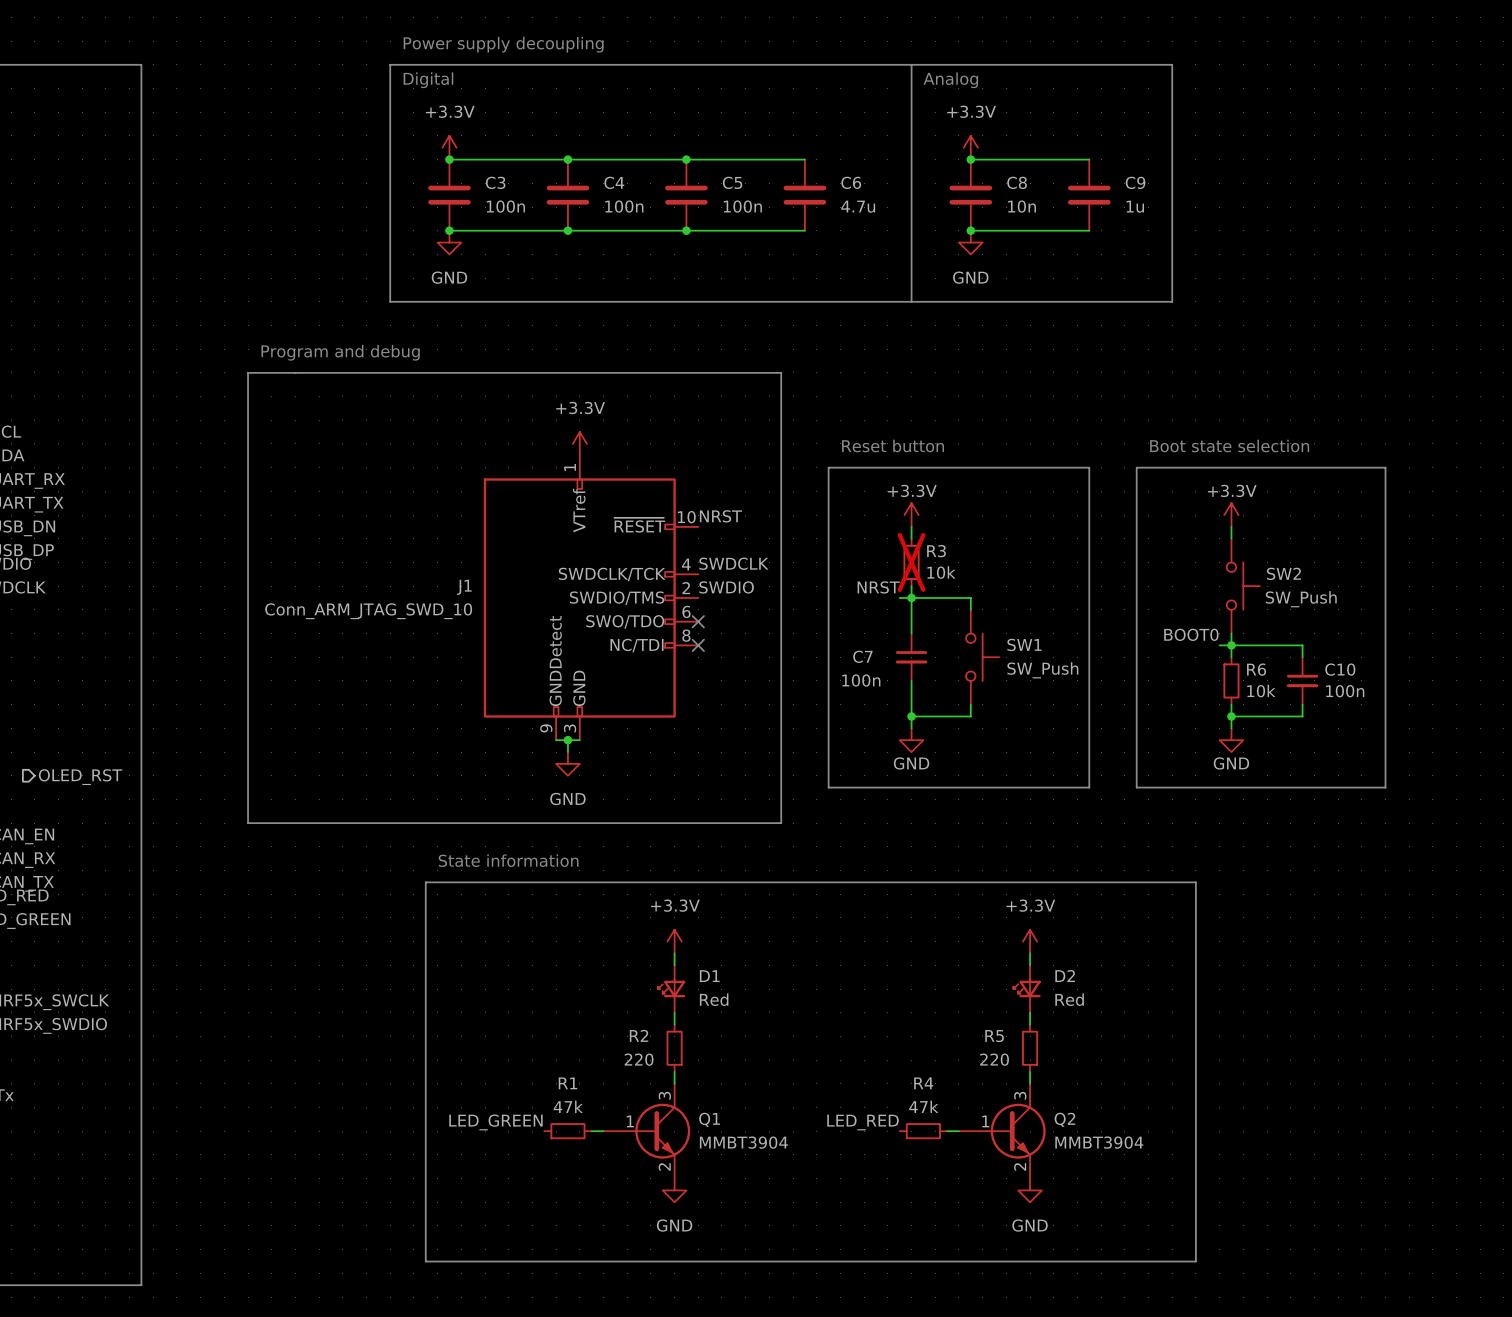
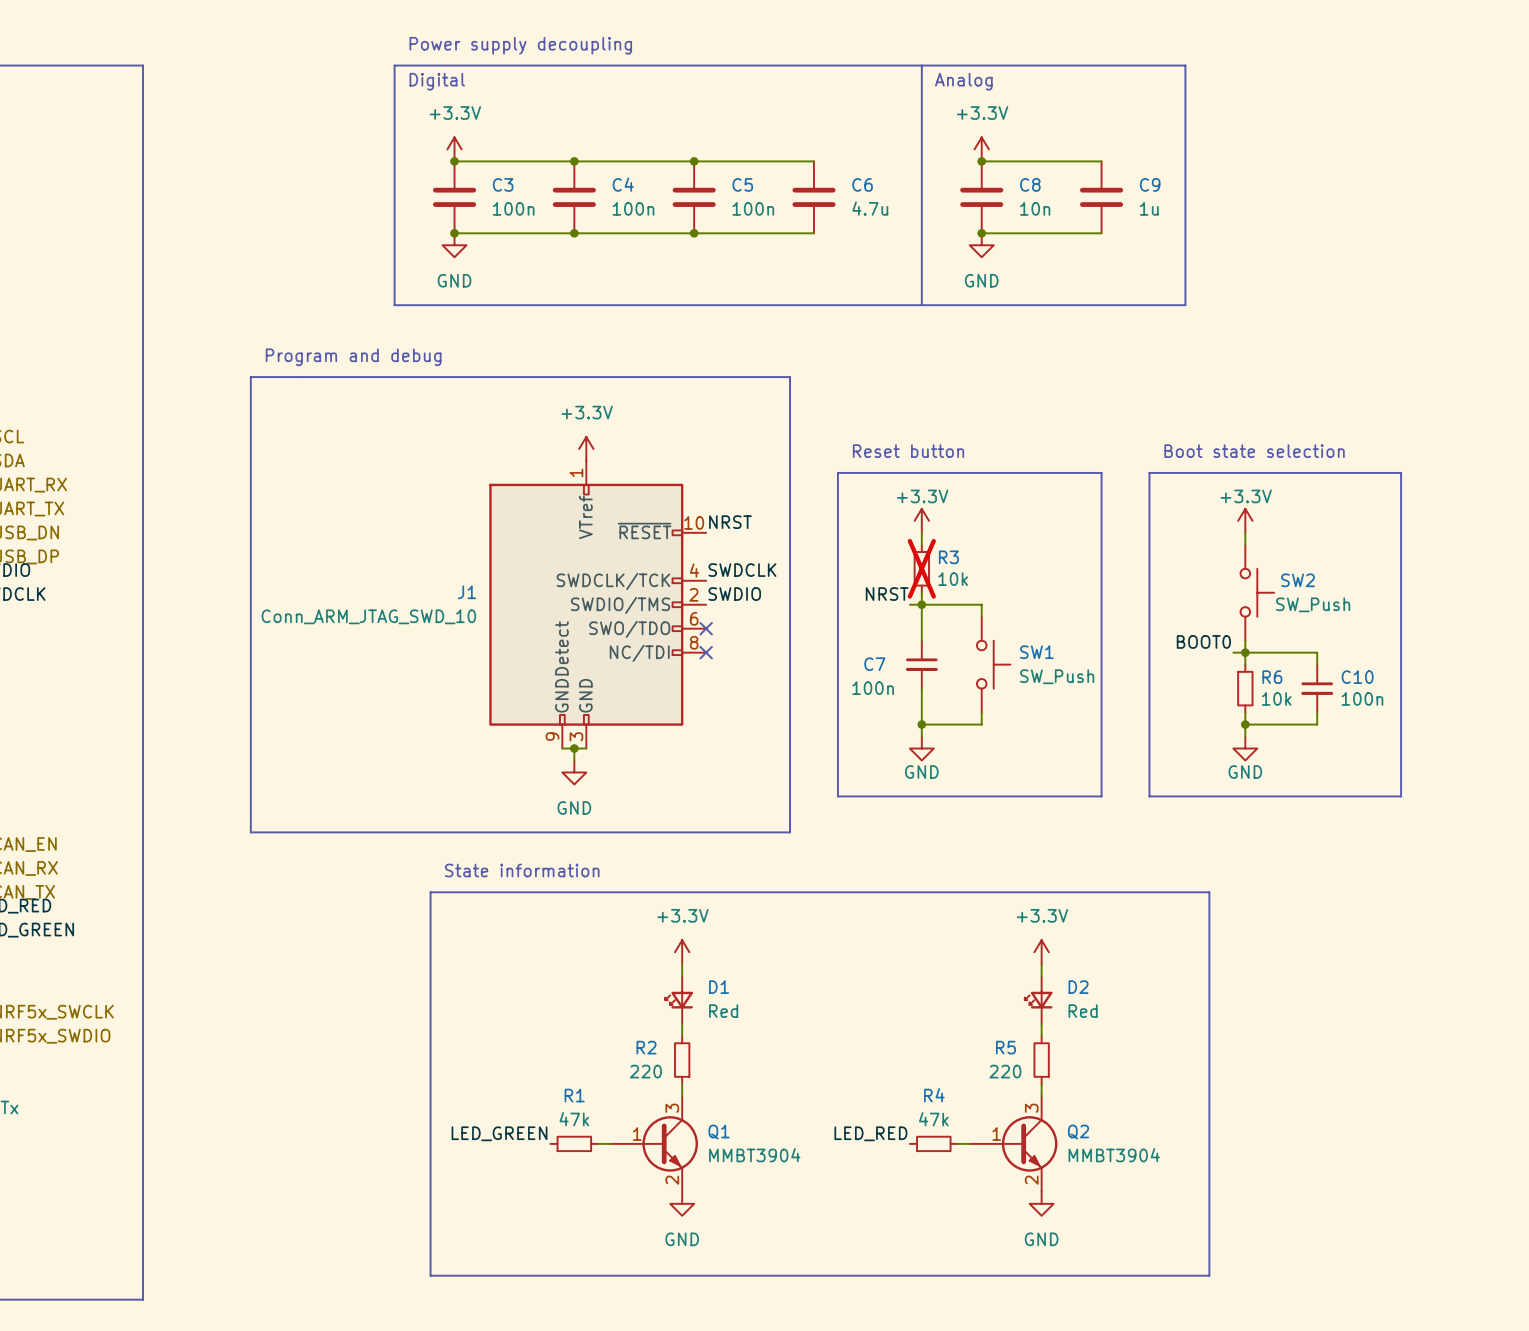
hierarchical label: OLED_RST (80, 777) -> none

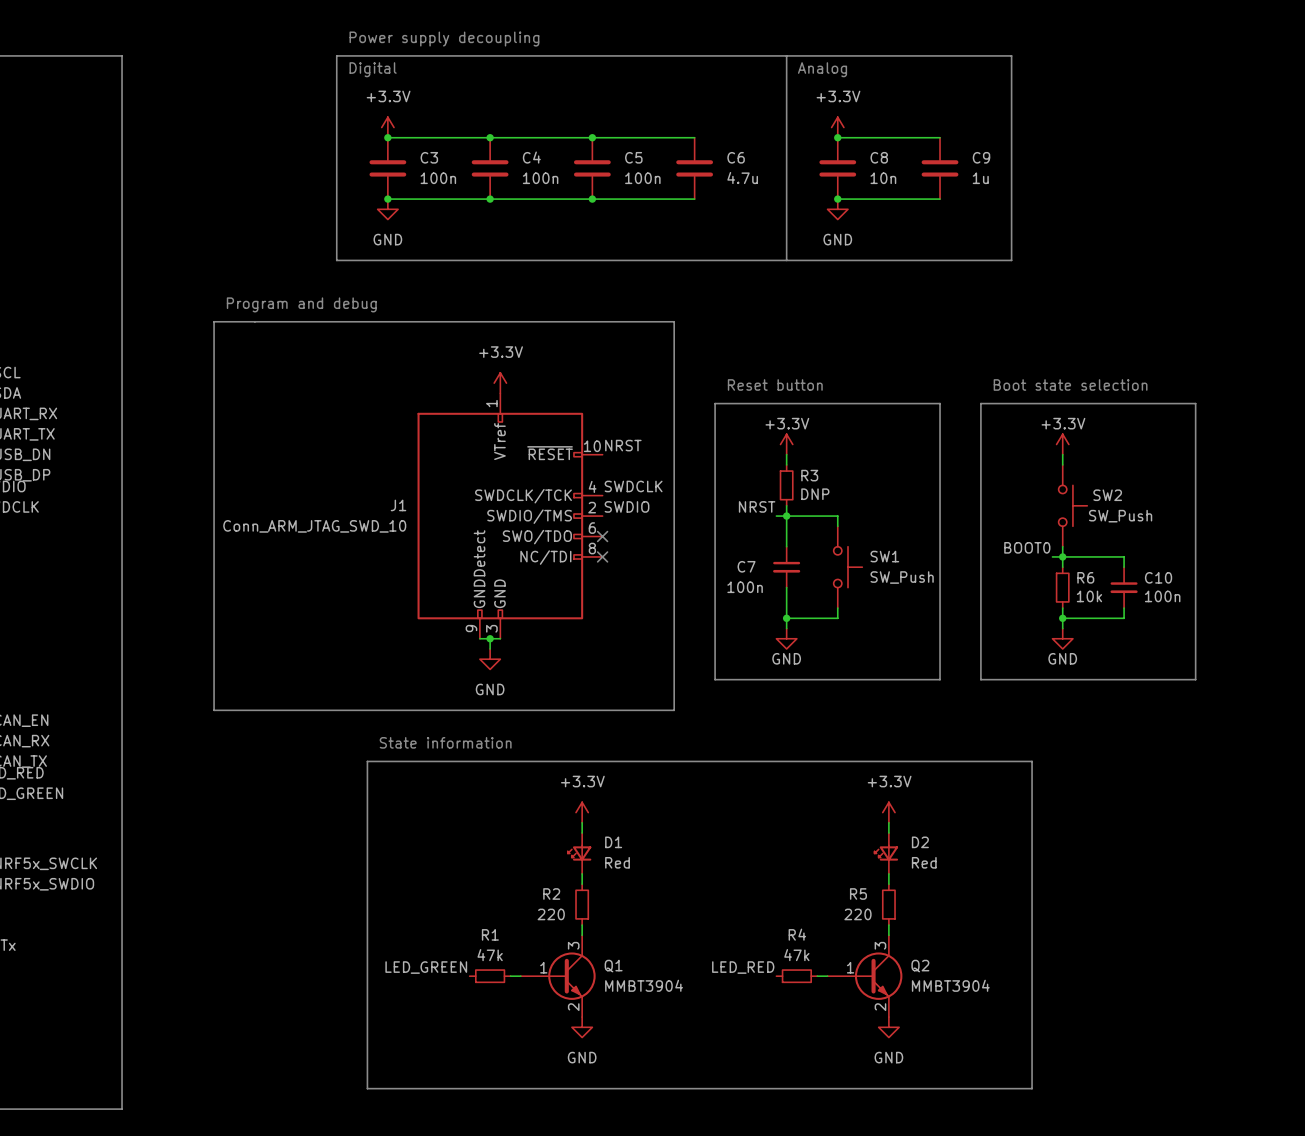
R3 do-not-place cross: (921, 568) -> none
R3 value: 10k (953, 579) -> DNP (815, 494)

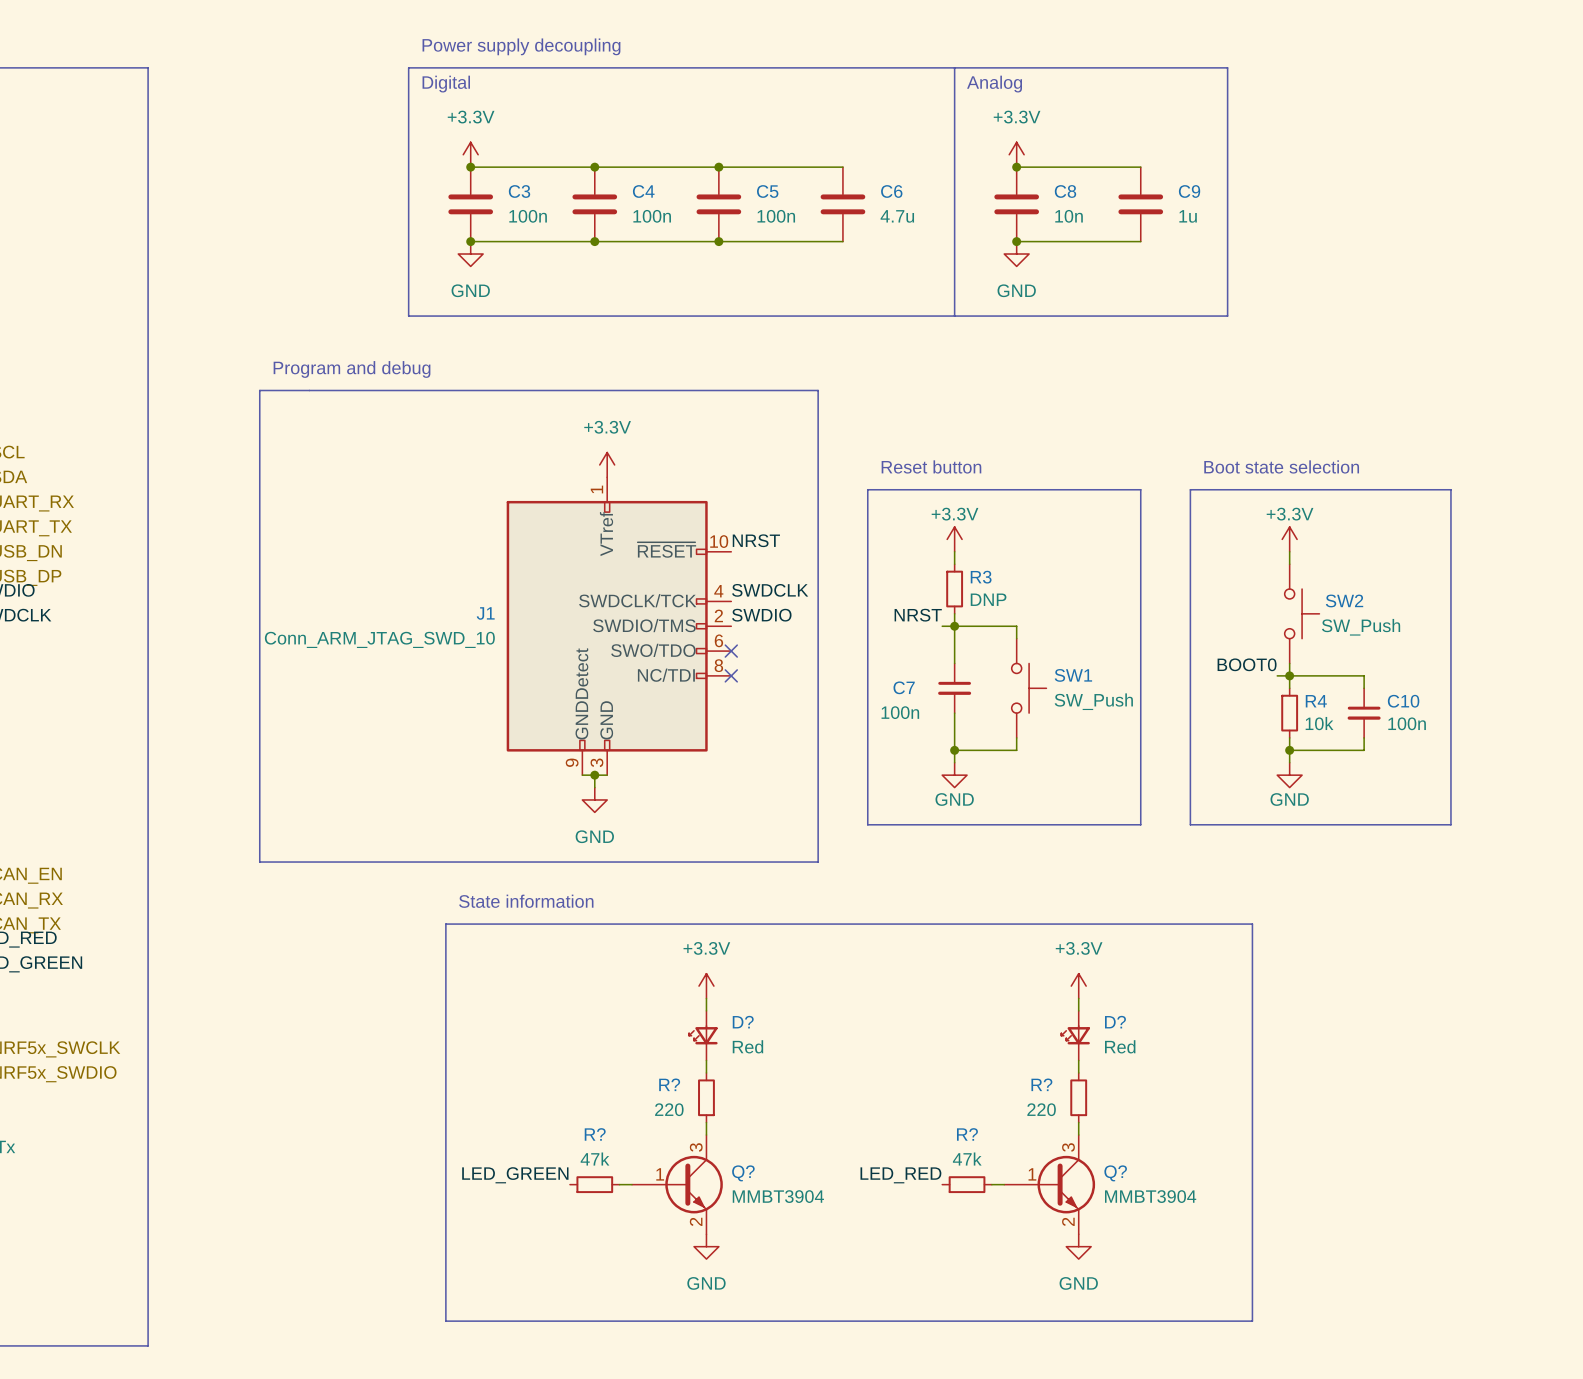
R6 name: R6 (1085, 577) -> R4 (1316, 701)
D1 name: D1 (613, 842) -> D? (743, 1022)
D2 name: D2 (920, 842) -> D? (1115, 1022)
R2 name: R2 (551, 894) -> R? (669, 1084)
R5 name: R5 (858, 894) -> R? (1041, 1084)
R1 name: R1 (490, 934) -> R? (595, 1134)
R4 name: R4 (797, 934) -> R? (967, 1134)
Q1 name: Q1 (613, 966) -> Q? (743, 1173)
Q2 name: Q2 (920, 966) -> Q? (1115, 1173)

